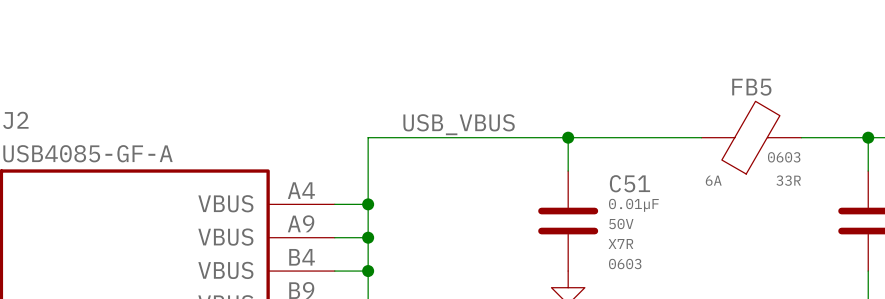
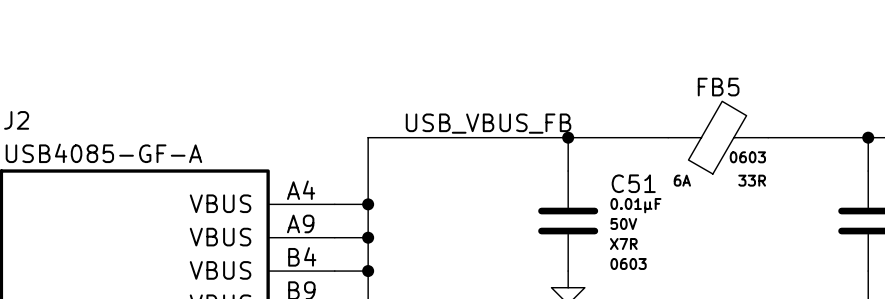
label: USB_VBUS (459, 124) -> USB_VBUS_FB (488, 123)
FB5 position: (751, 137) -> (718, 137)

